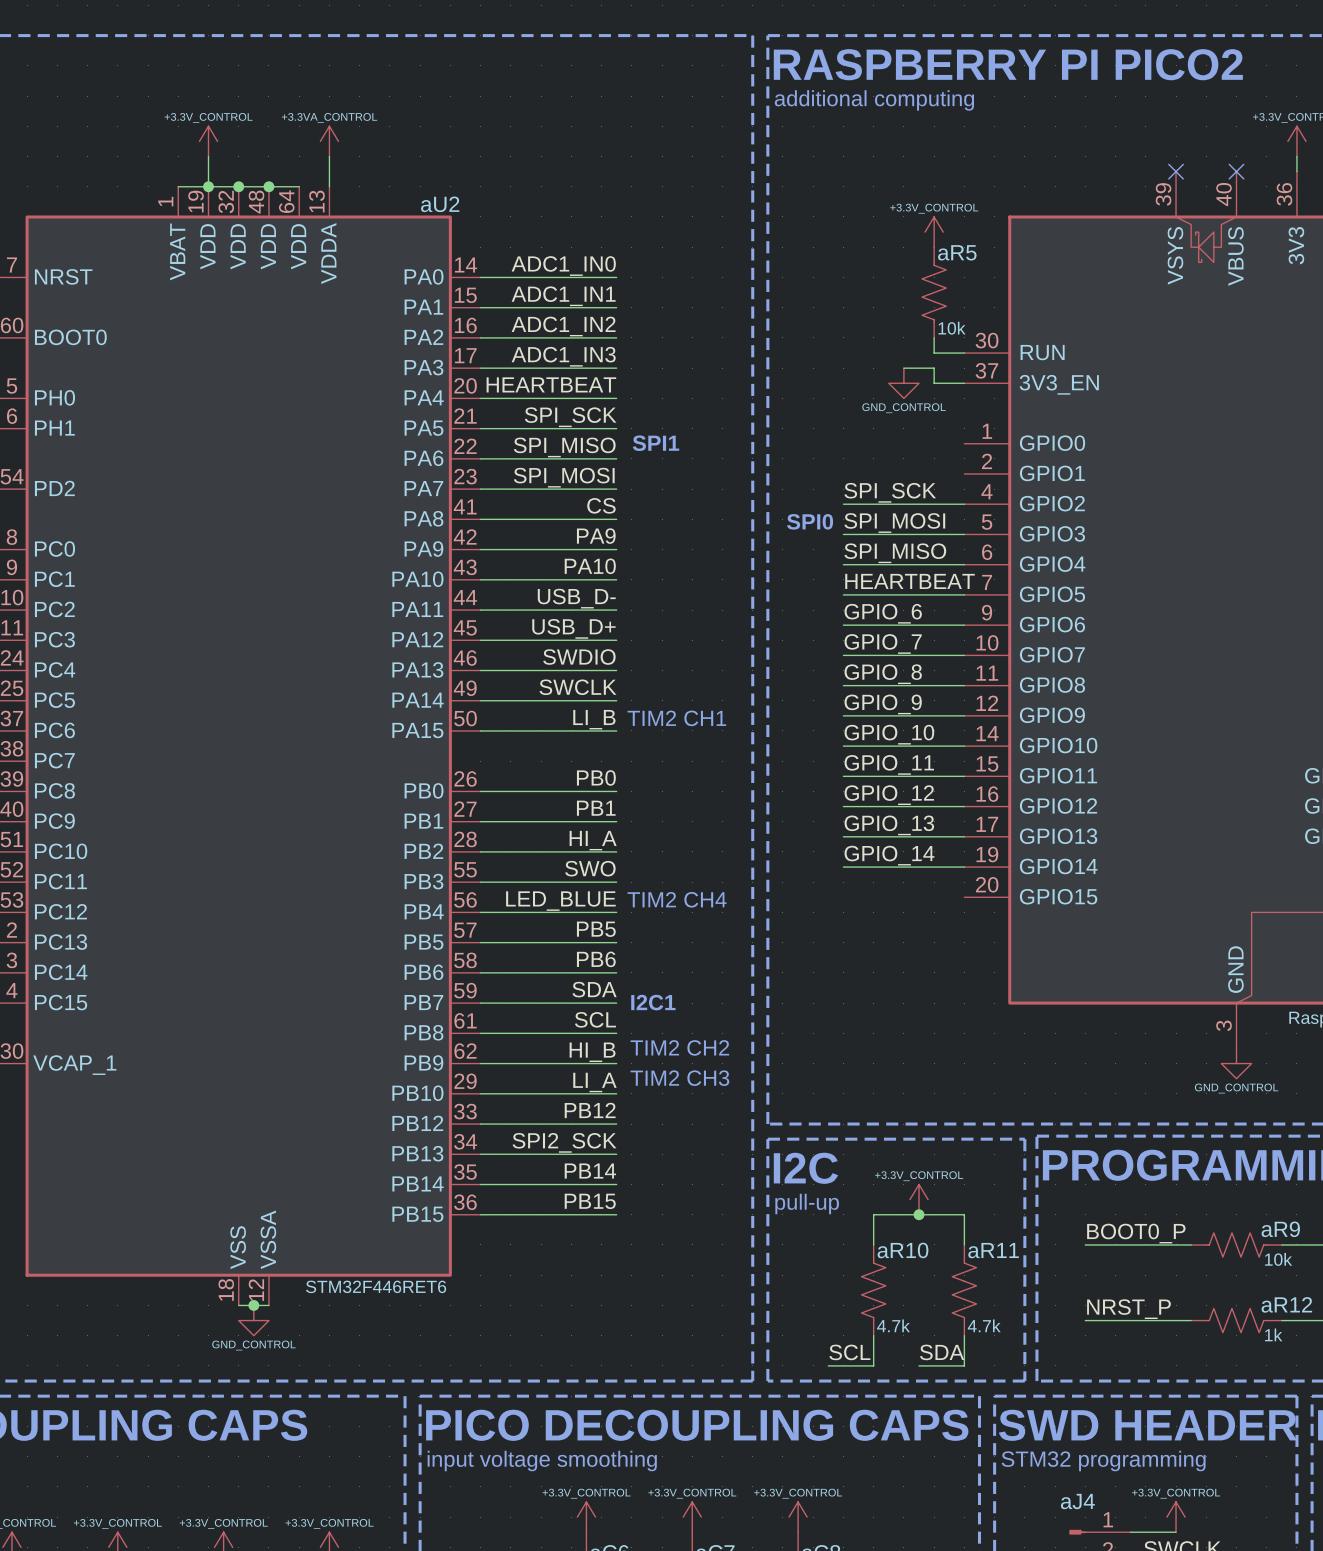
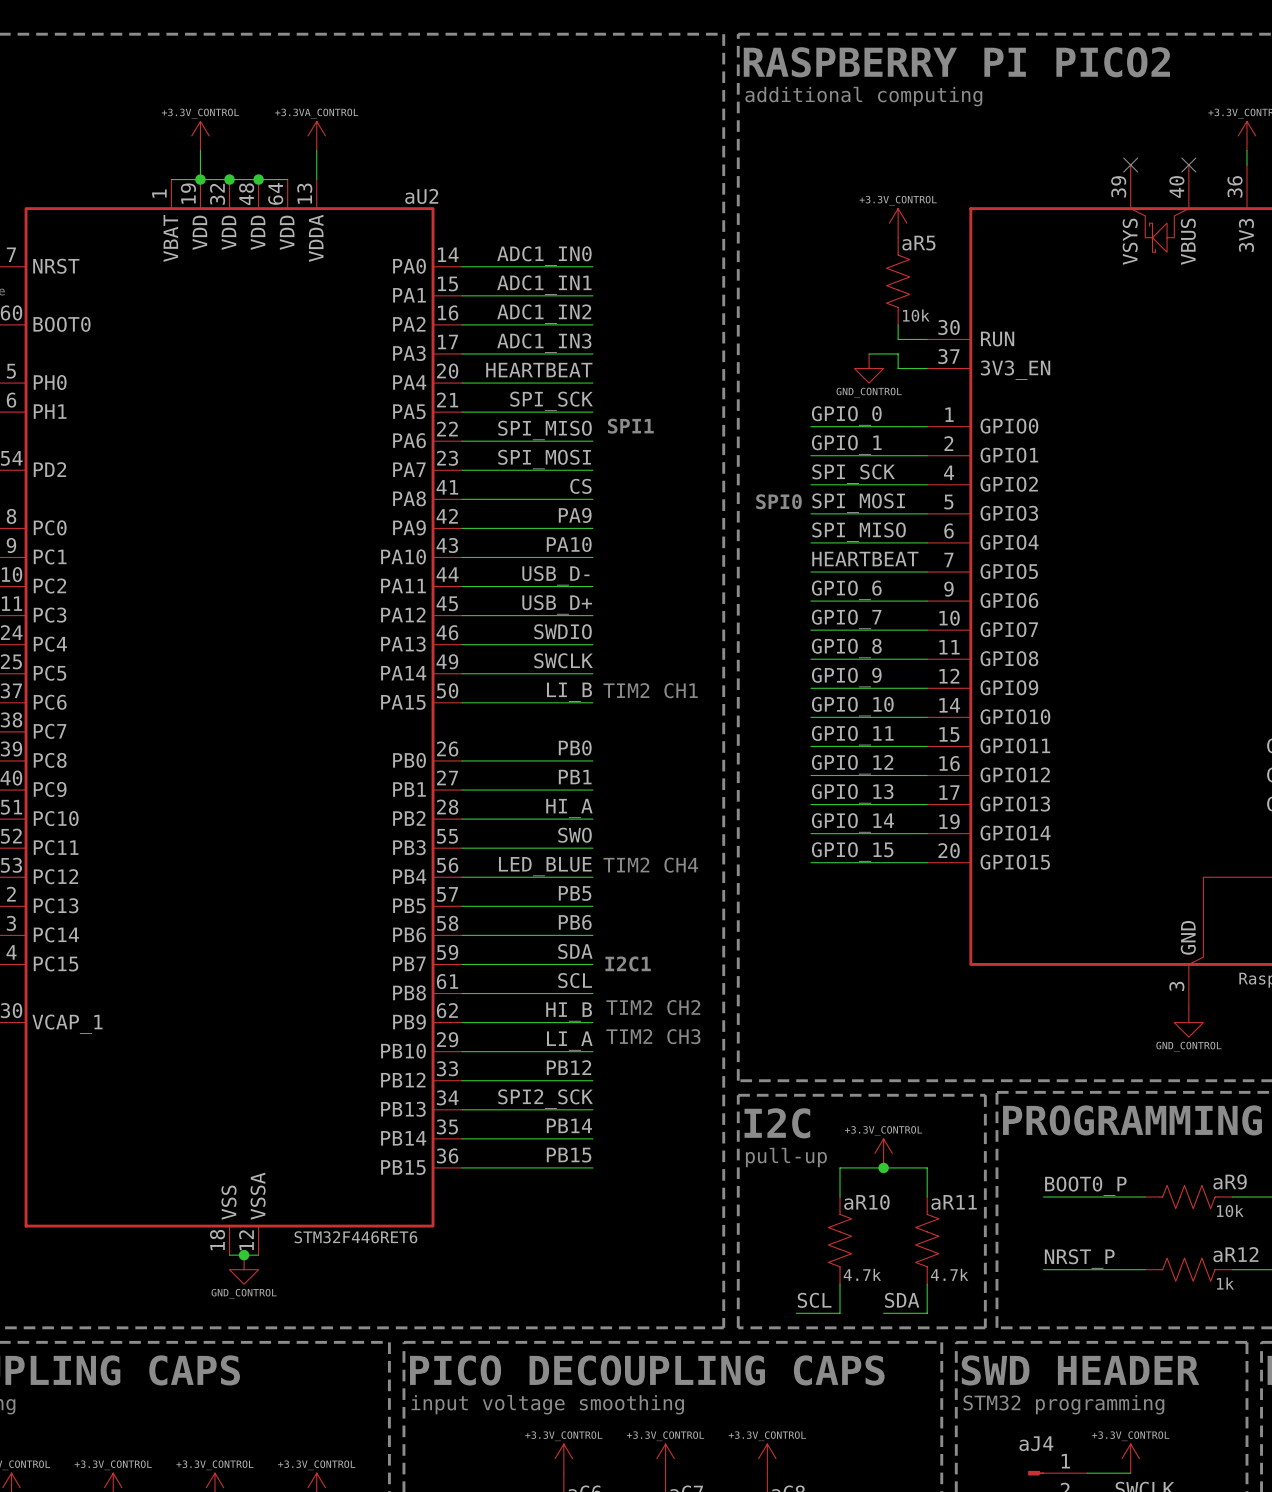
label: none -> GPIO_0 (846, 415)
wire: none -> (810, 426) (927, 426)
label: none -> GPIO_1 (846, 444)
wire: none -> (810, 455) (927, 455)
label: none -> GPIO_15 (852, 851)
wire: none -> (810, 862) (927, 862)

